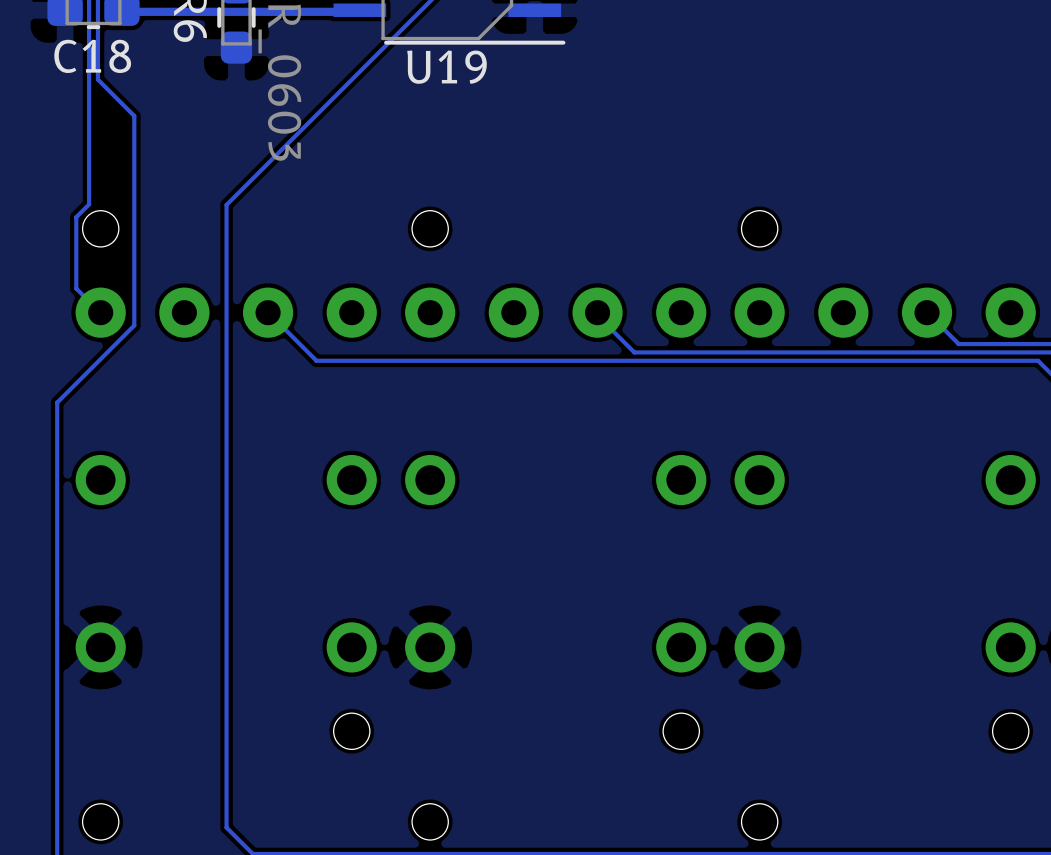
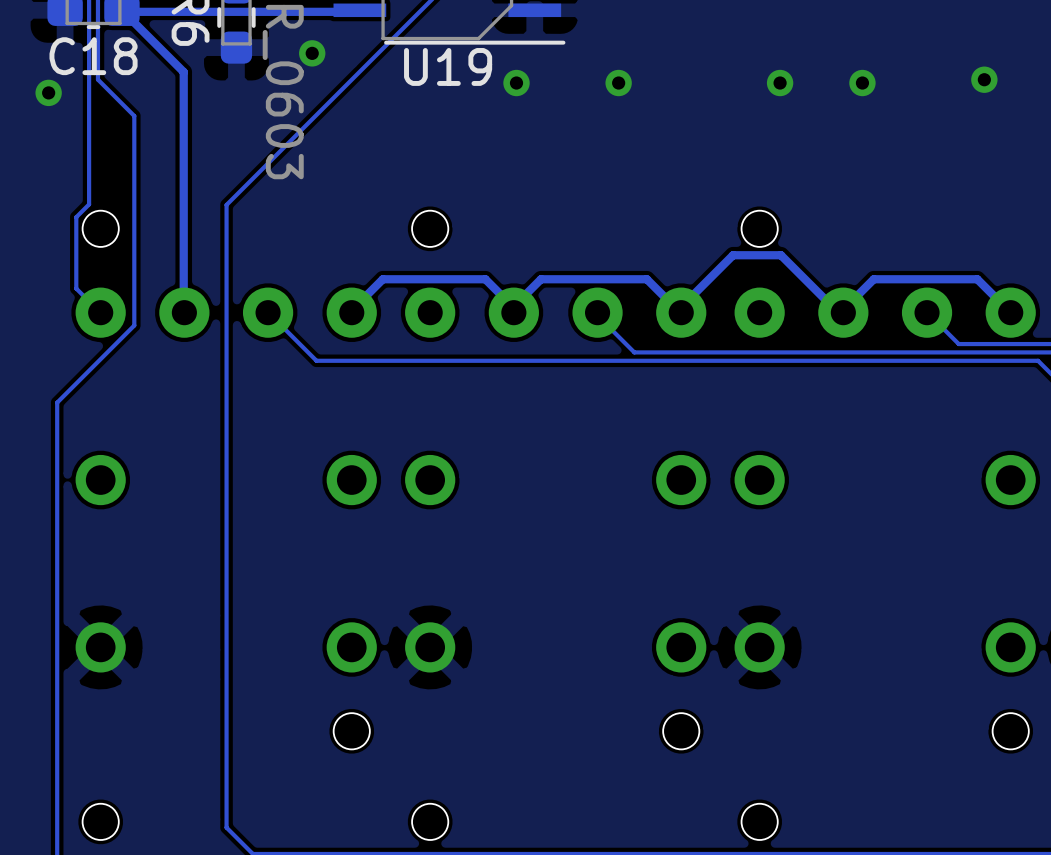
track: none -> (121, 10) (183, 72) (183, 313)
via: none -> (312, 53)
via: none -> (984, 79)
via: none -> (516, 83)
via: none -> (618, 83)
via: none -> (780, 83)
via: none -> (862, 83)
via: none -> (48, 92)
track: none -> (351, 310) (382, 279) (485, 279) (513, 307) (541, 279) (646, 279) (677, 310) (733, 255) (780, 255) (839, 313) (873, 279) (977, 279) (1010, 312)

